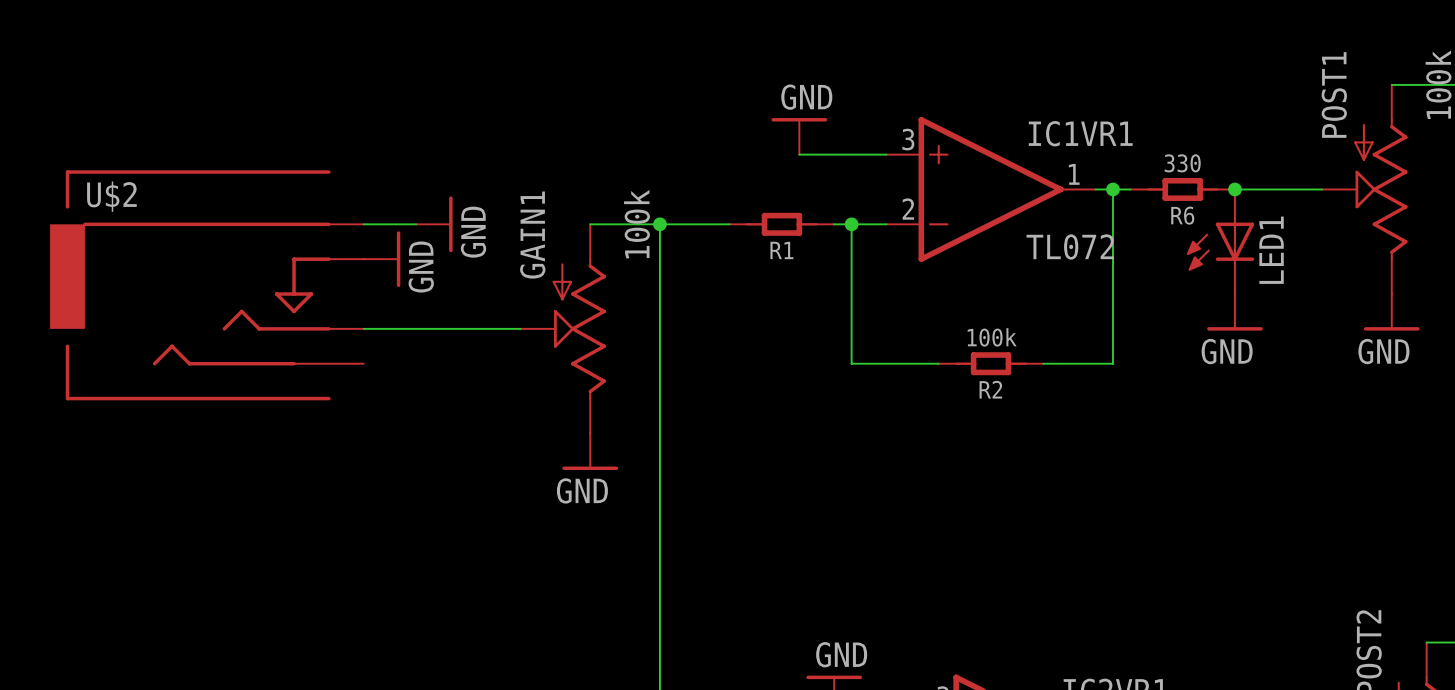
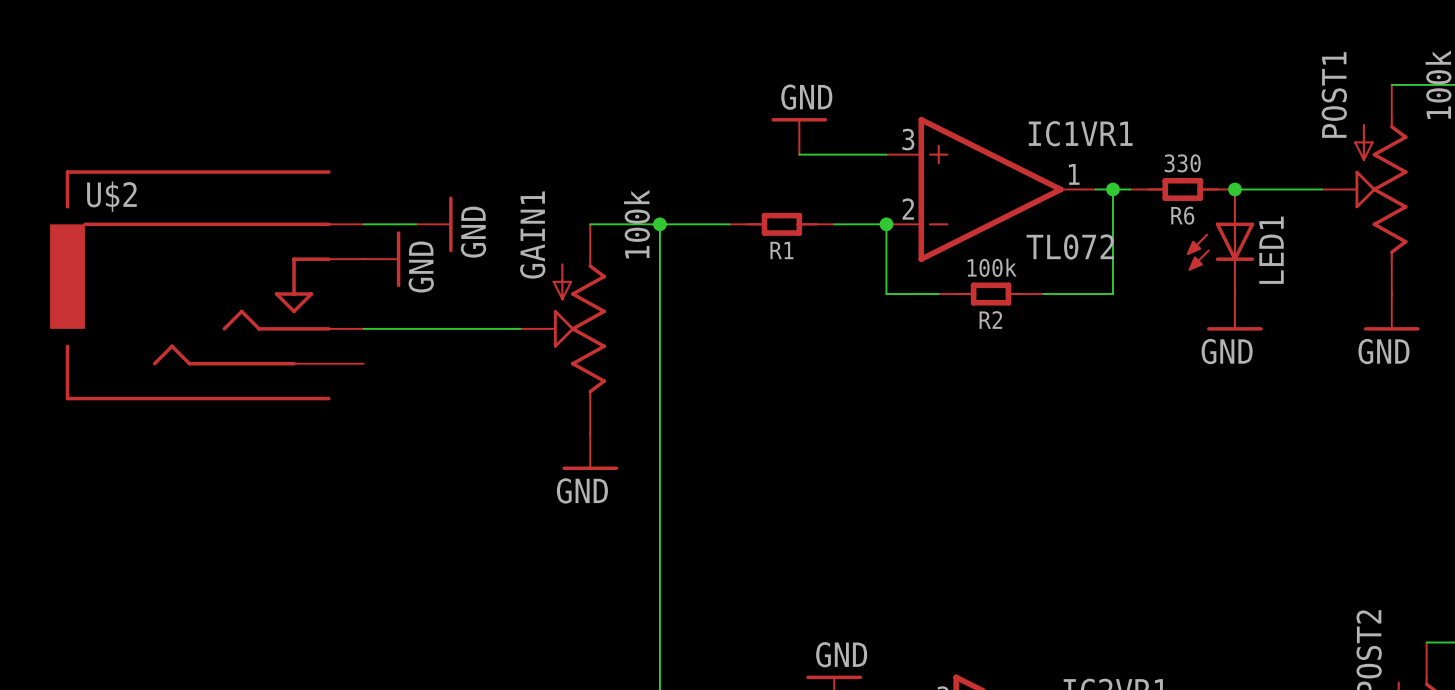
wire: (851, 224) (851, 363) (938, 363) -> none
junction position: (851, 224) -> (886, 224)
wire: none -> (886, 224) (886, 294) (938, 294)
wire: (1112, 294) (1112, 363) (1043, 363) -> (1112, 294) (1043, 294)
R2 position: (991, 363) -> (991, 294)

